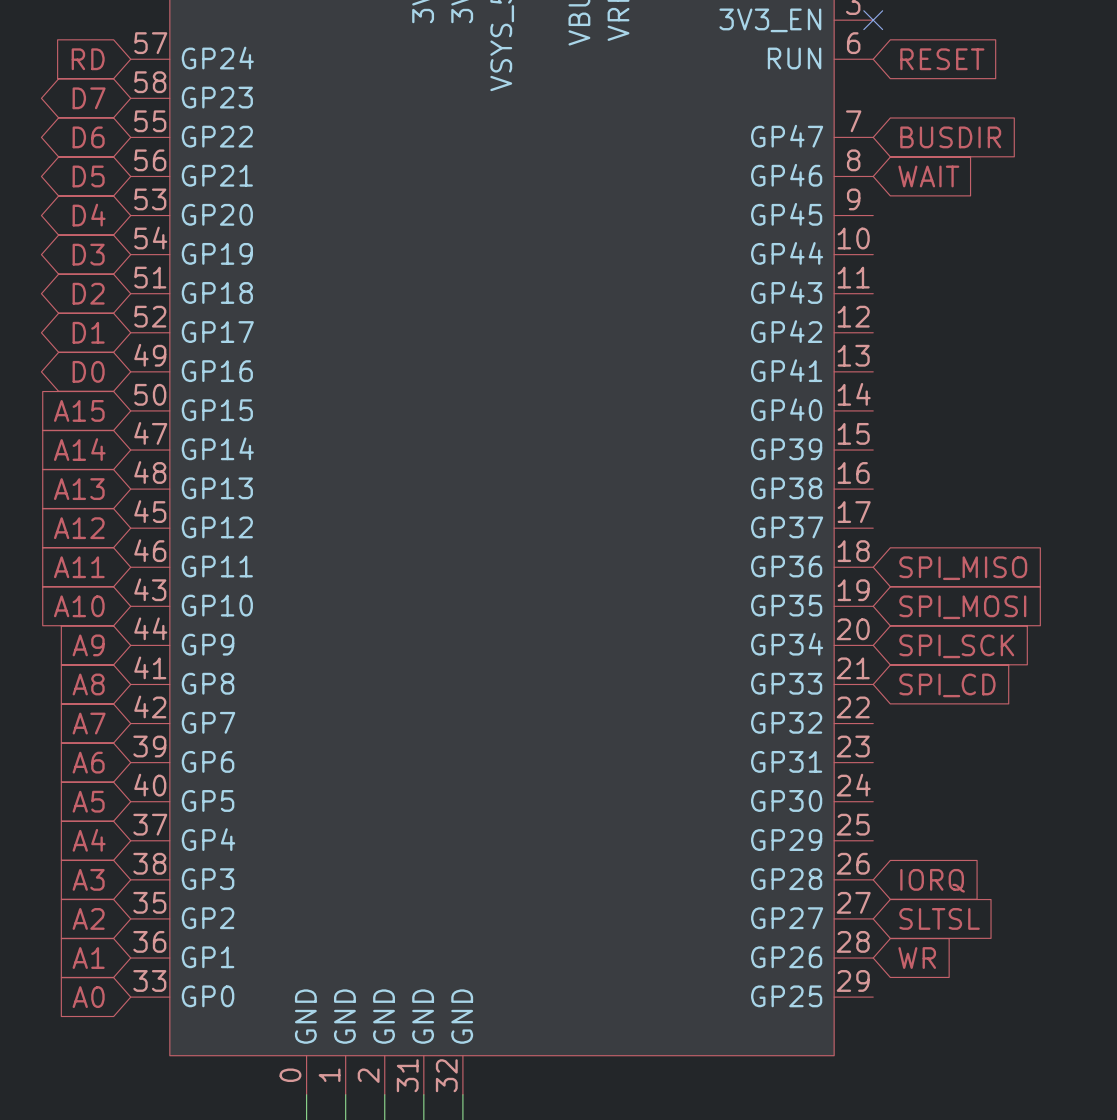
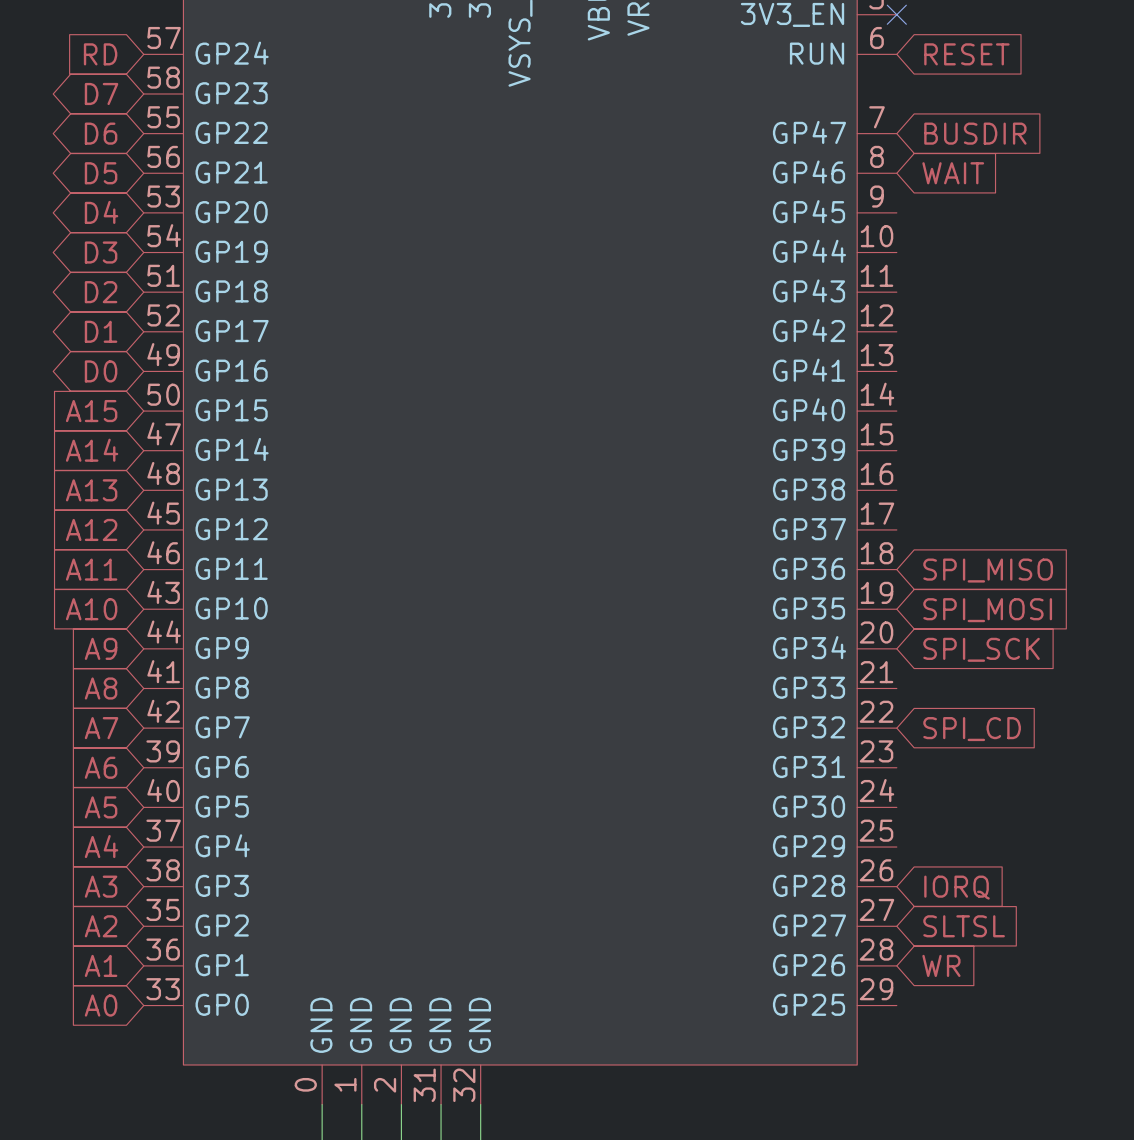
global label position: SPI_CD (947, 685) -> SPI_CD (972, 729)

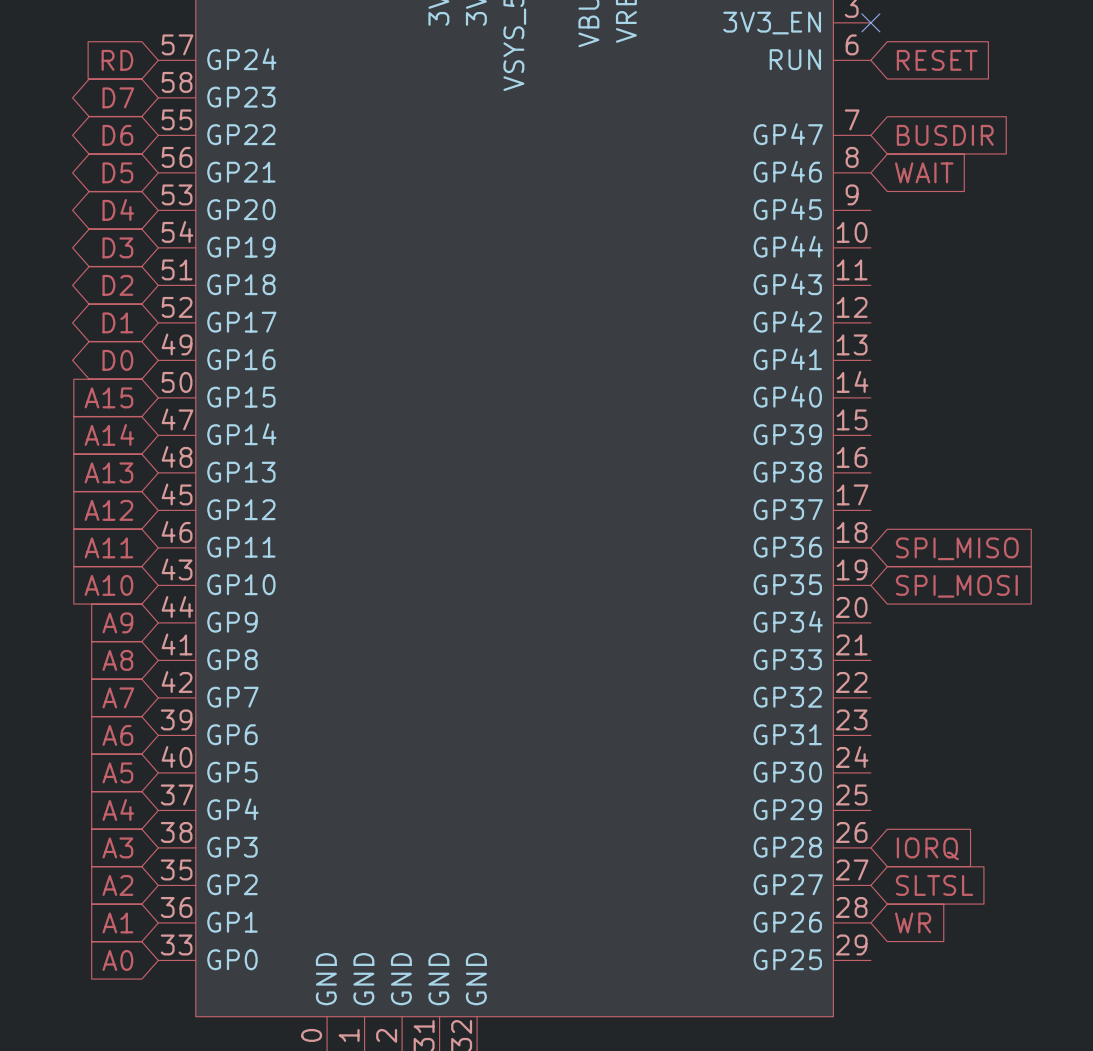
global label: SPI_SCK (981, 649) -> none
global label: SPI_CD (972, 729) -> none

